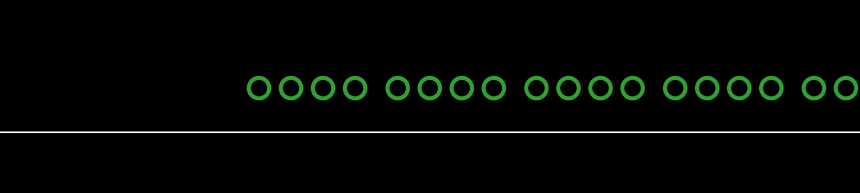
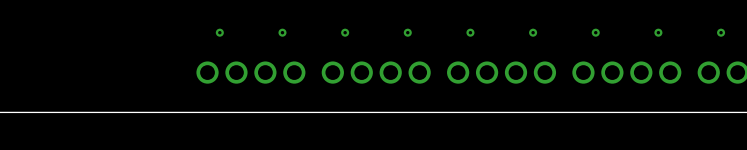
via: none -> (219, 32)
via: none -> (282, 32)
via: none -> (345, 32)
via: none -> (407, 32)
via: none -> (470, 32)
via: none -> (533, 32)
via: none -> (595, 32)
via: none -> (658, 32)
via: none -> (721, 32)

